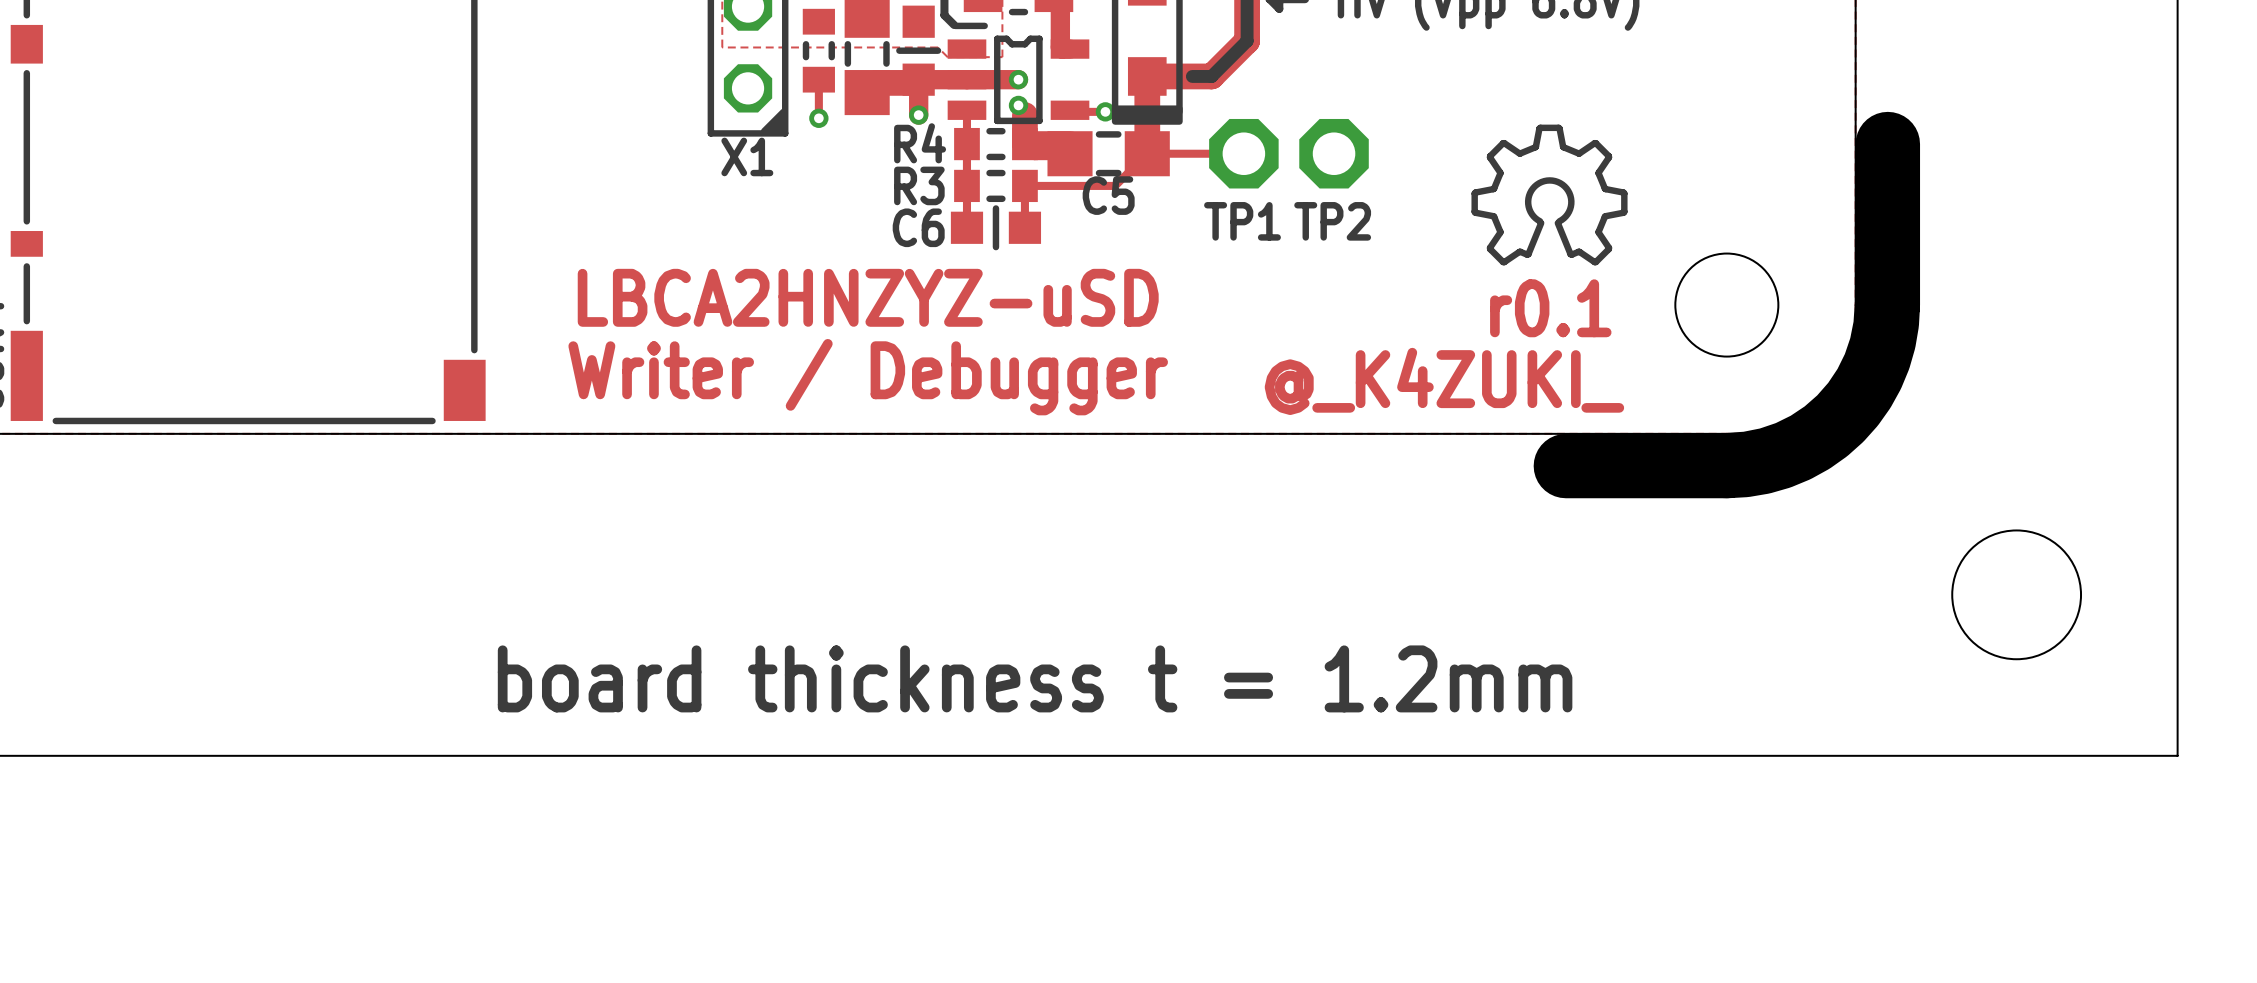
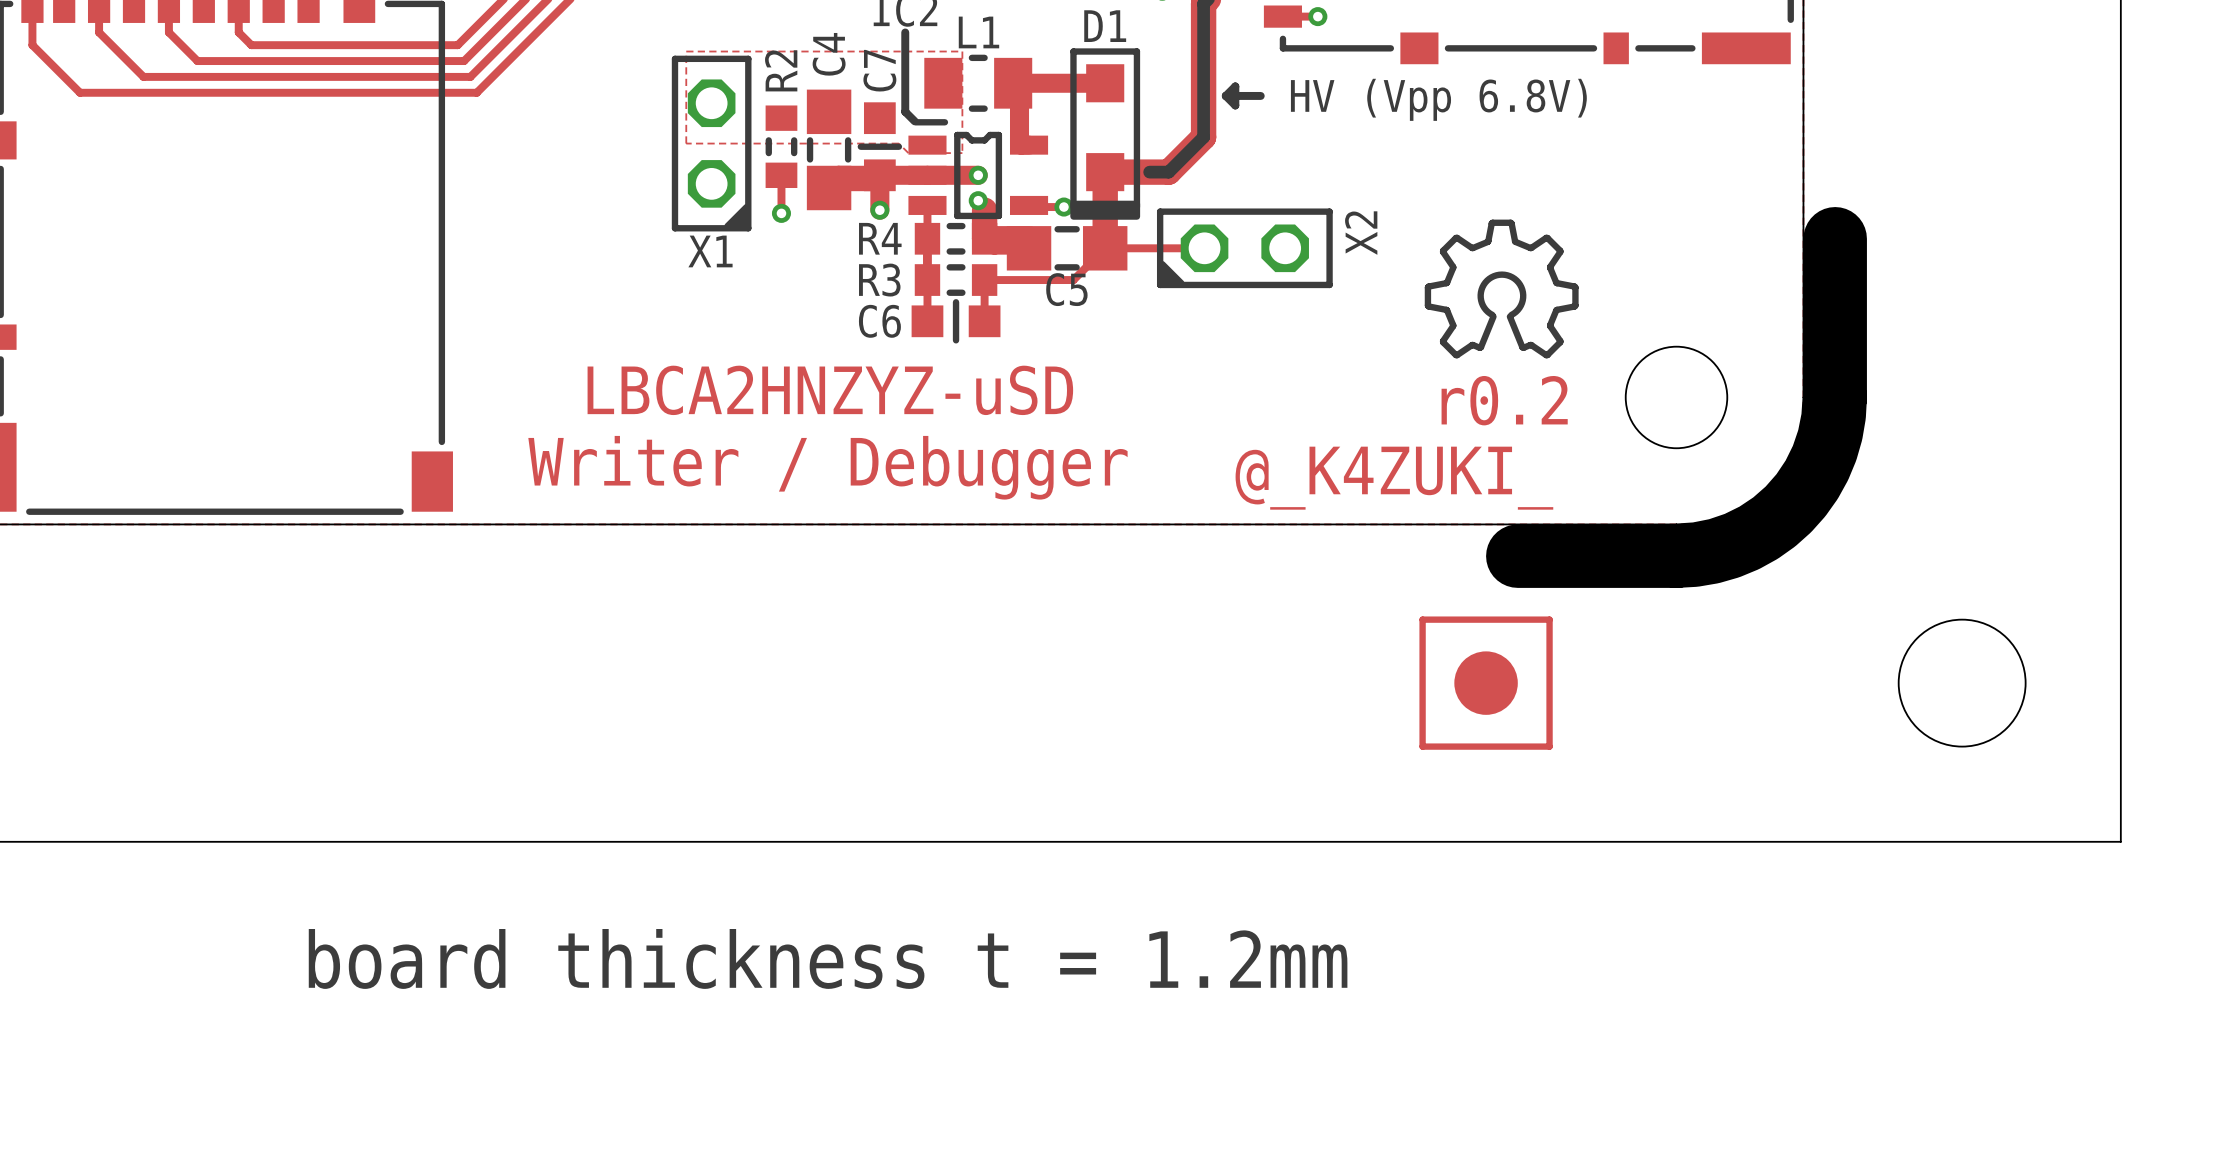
TP1: (1243, 153) -> none
X2: none -> (1244, 248)
TP2: (1334, 153) -> none
text: r0.1 (1550, 308) -> r0.2 (1504, 400)
part: none -> (1486, 683)
text position: board thickness t = 1.2mm (1035, 678) -> board thickness t = 1.2mm (828, 958)

